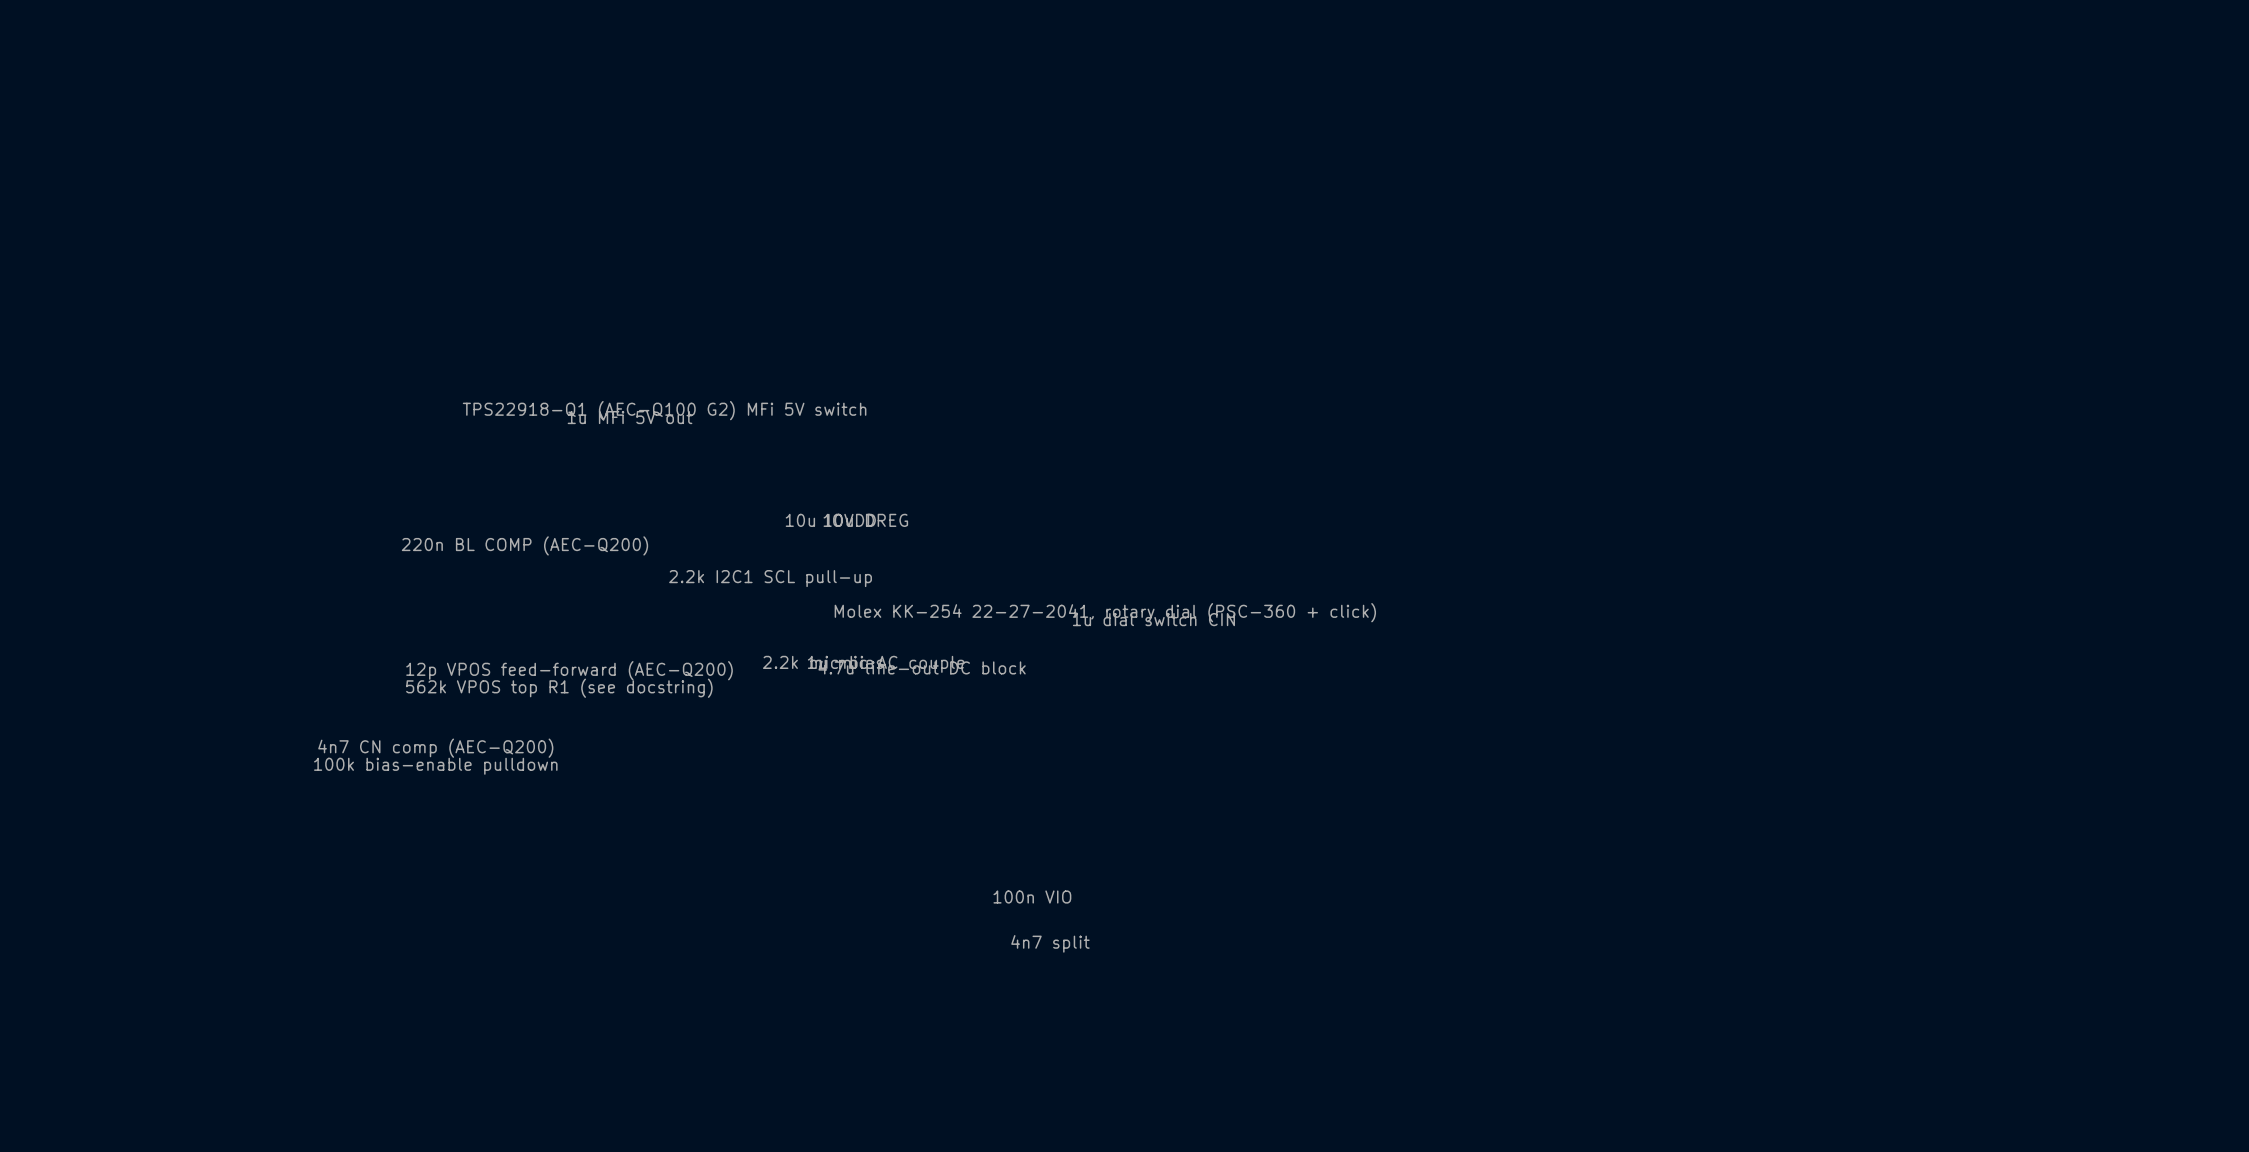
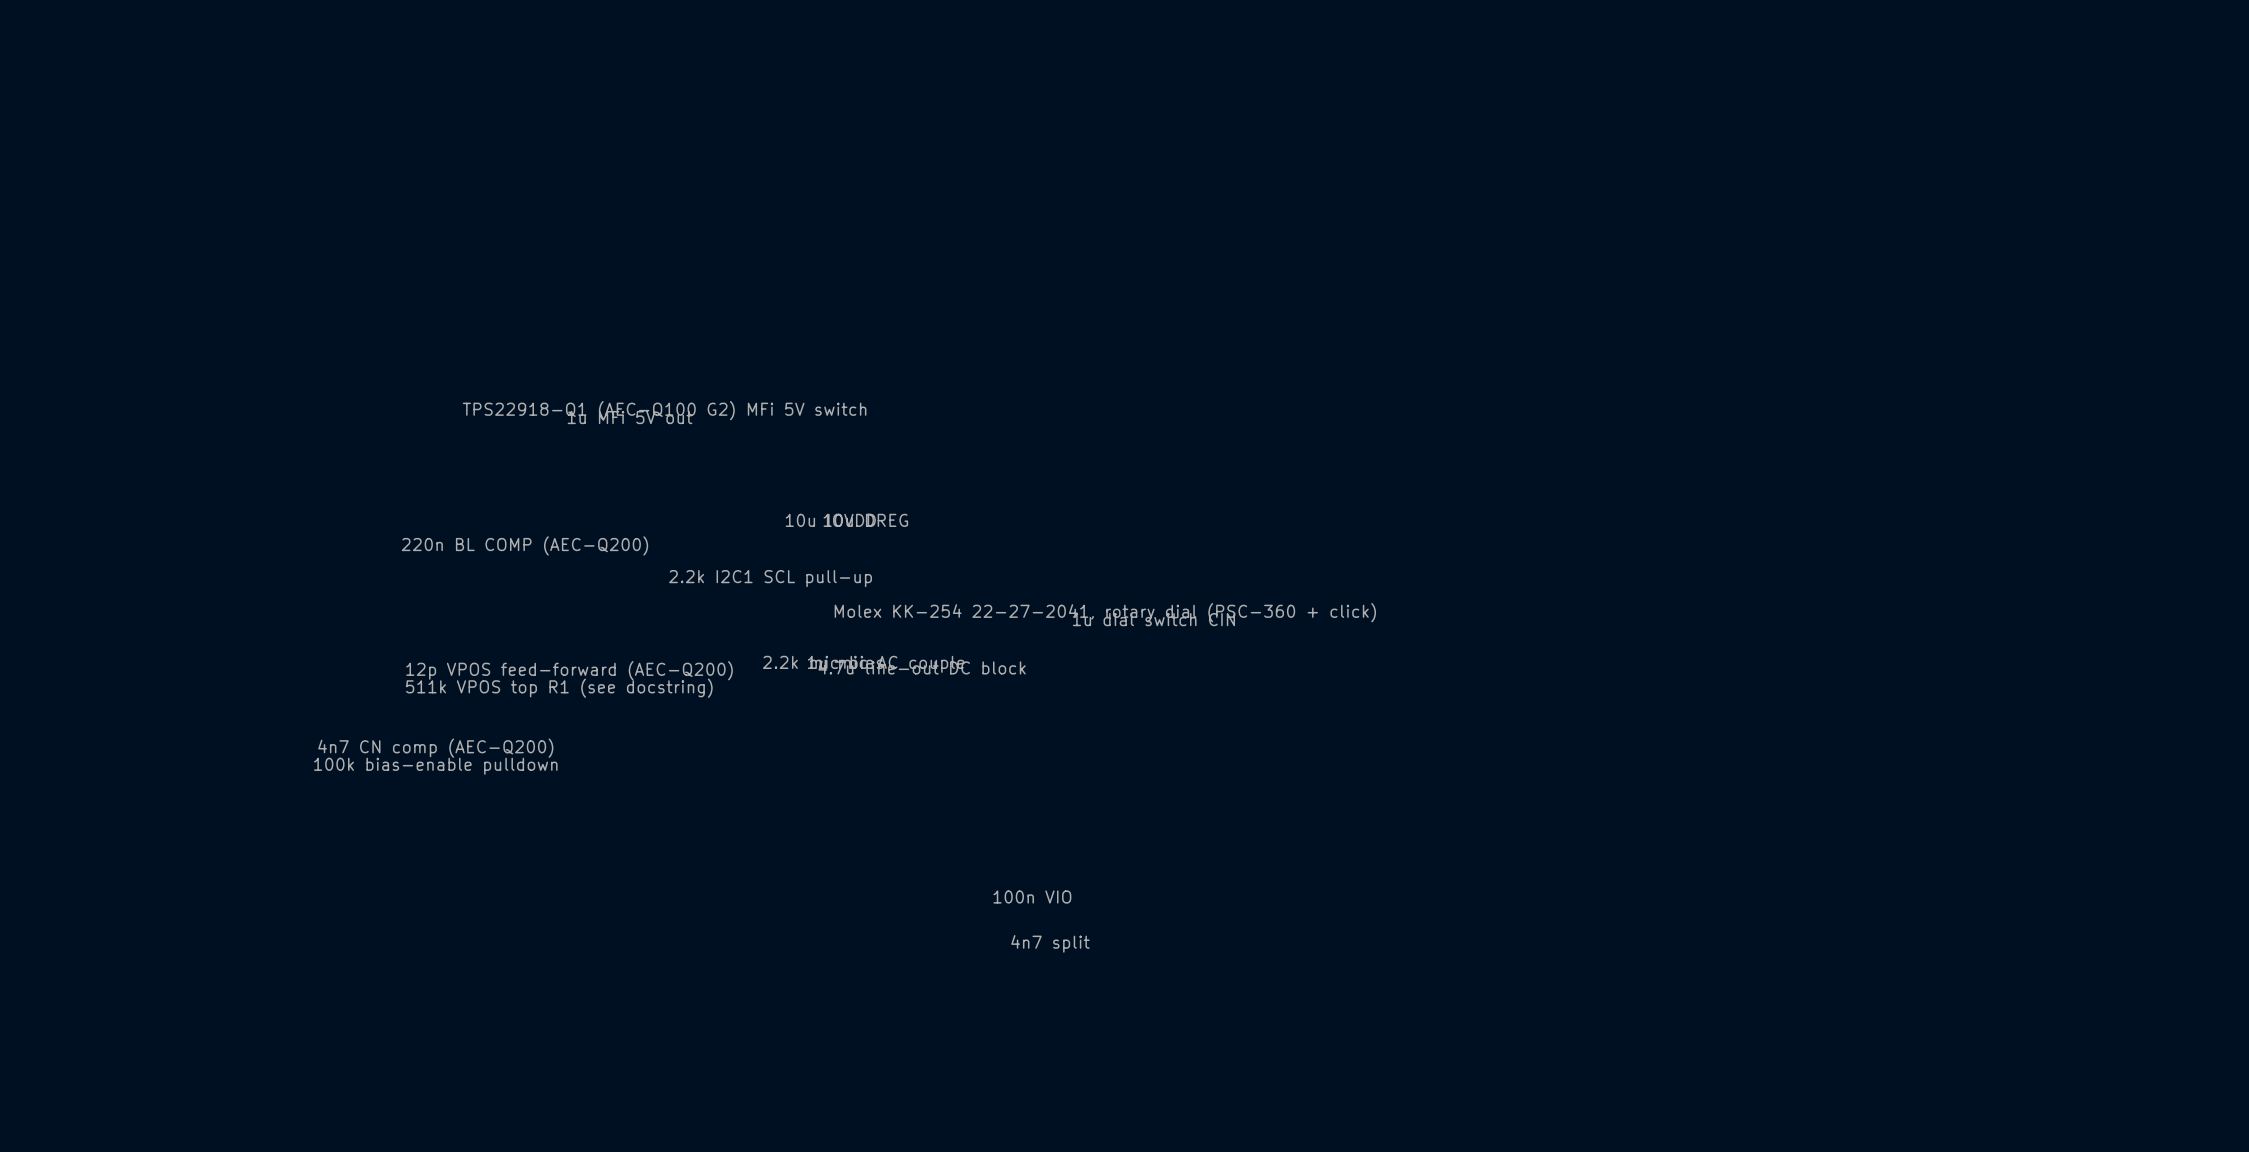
part value: 562k VPOS top R1 (see docstring) (559, 688) -> 511k VPOS top R1 (see docstring) (559, 688)

